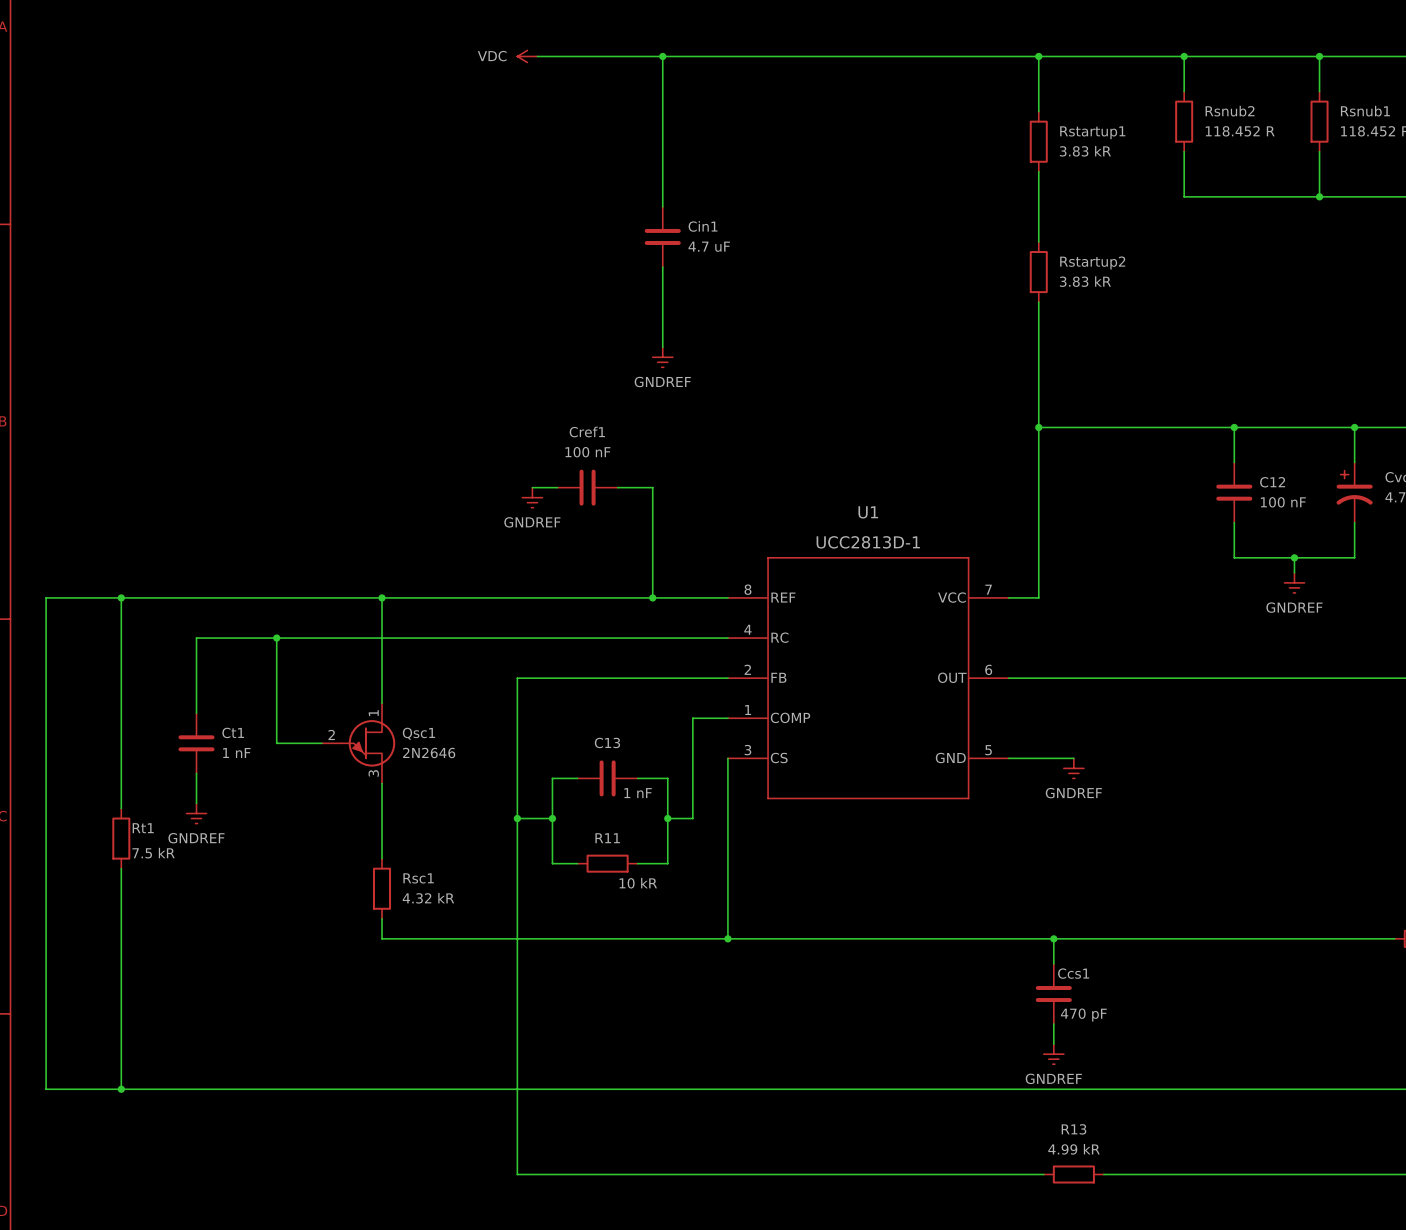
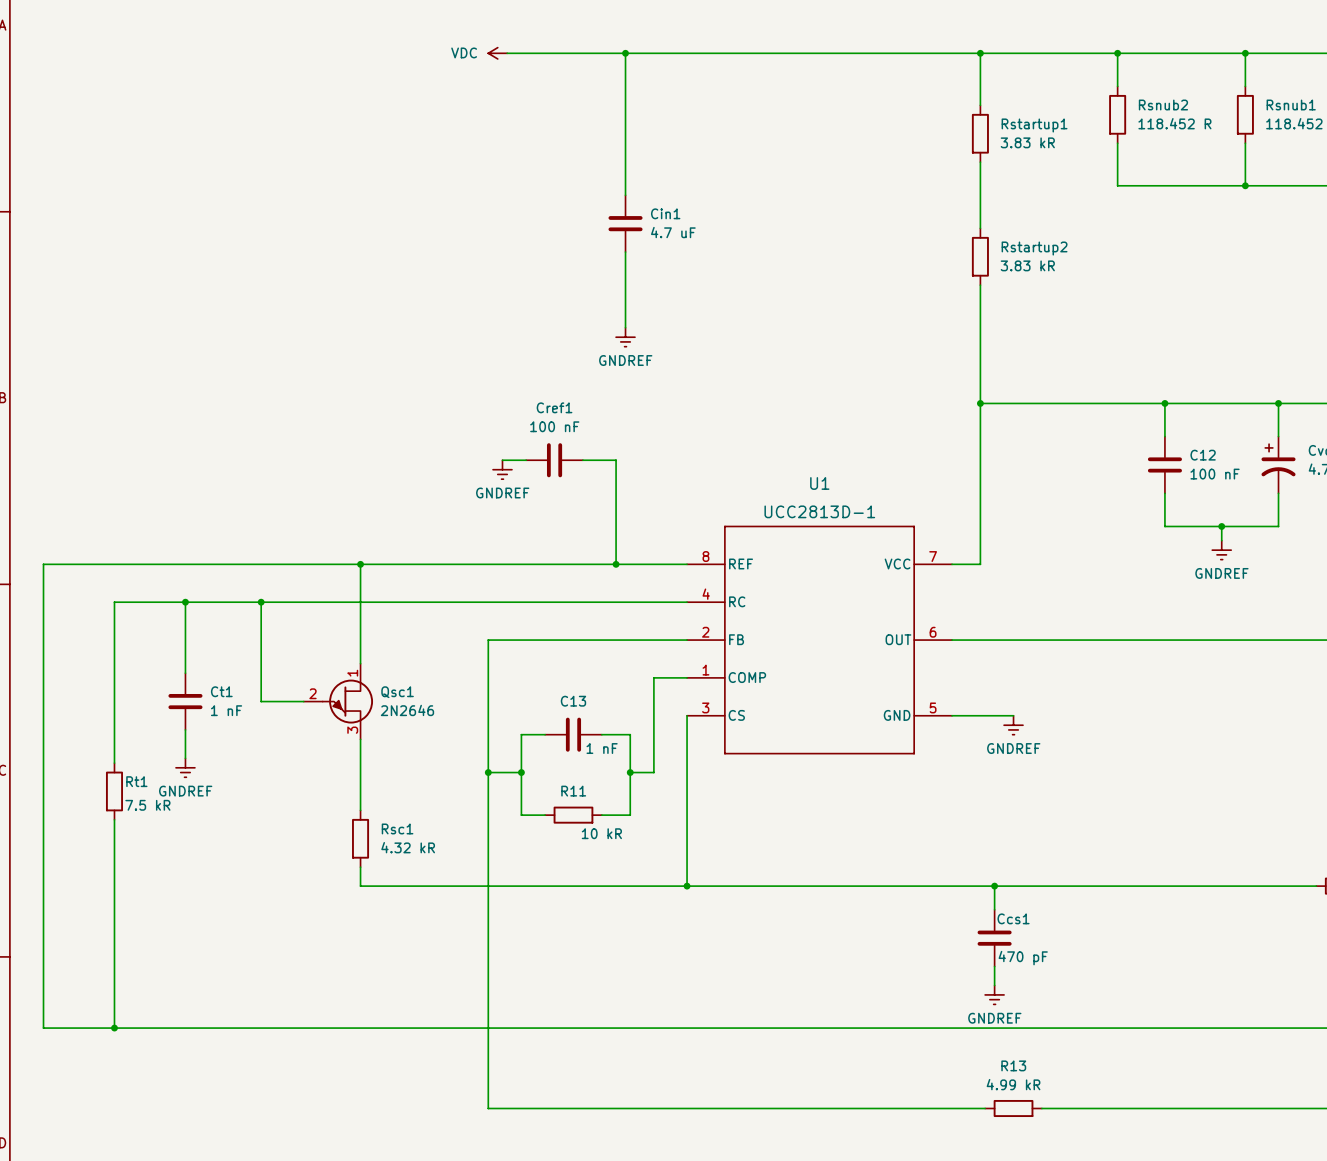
wire: (121, 597) (121, 638) -> (185, 602) (114, 602)
junction: (121, 597) -> none
junction: none -> (185, 602)

